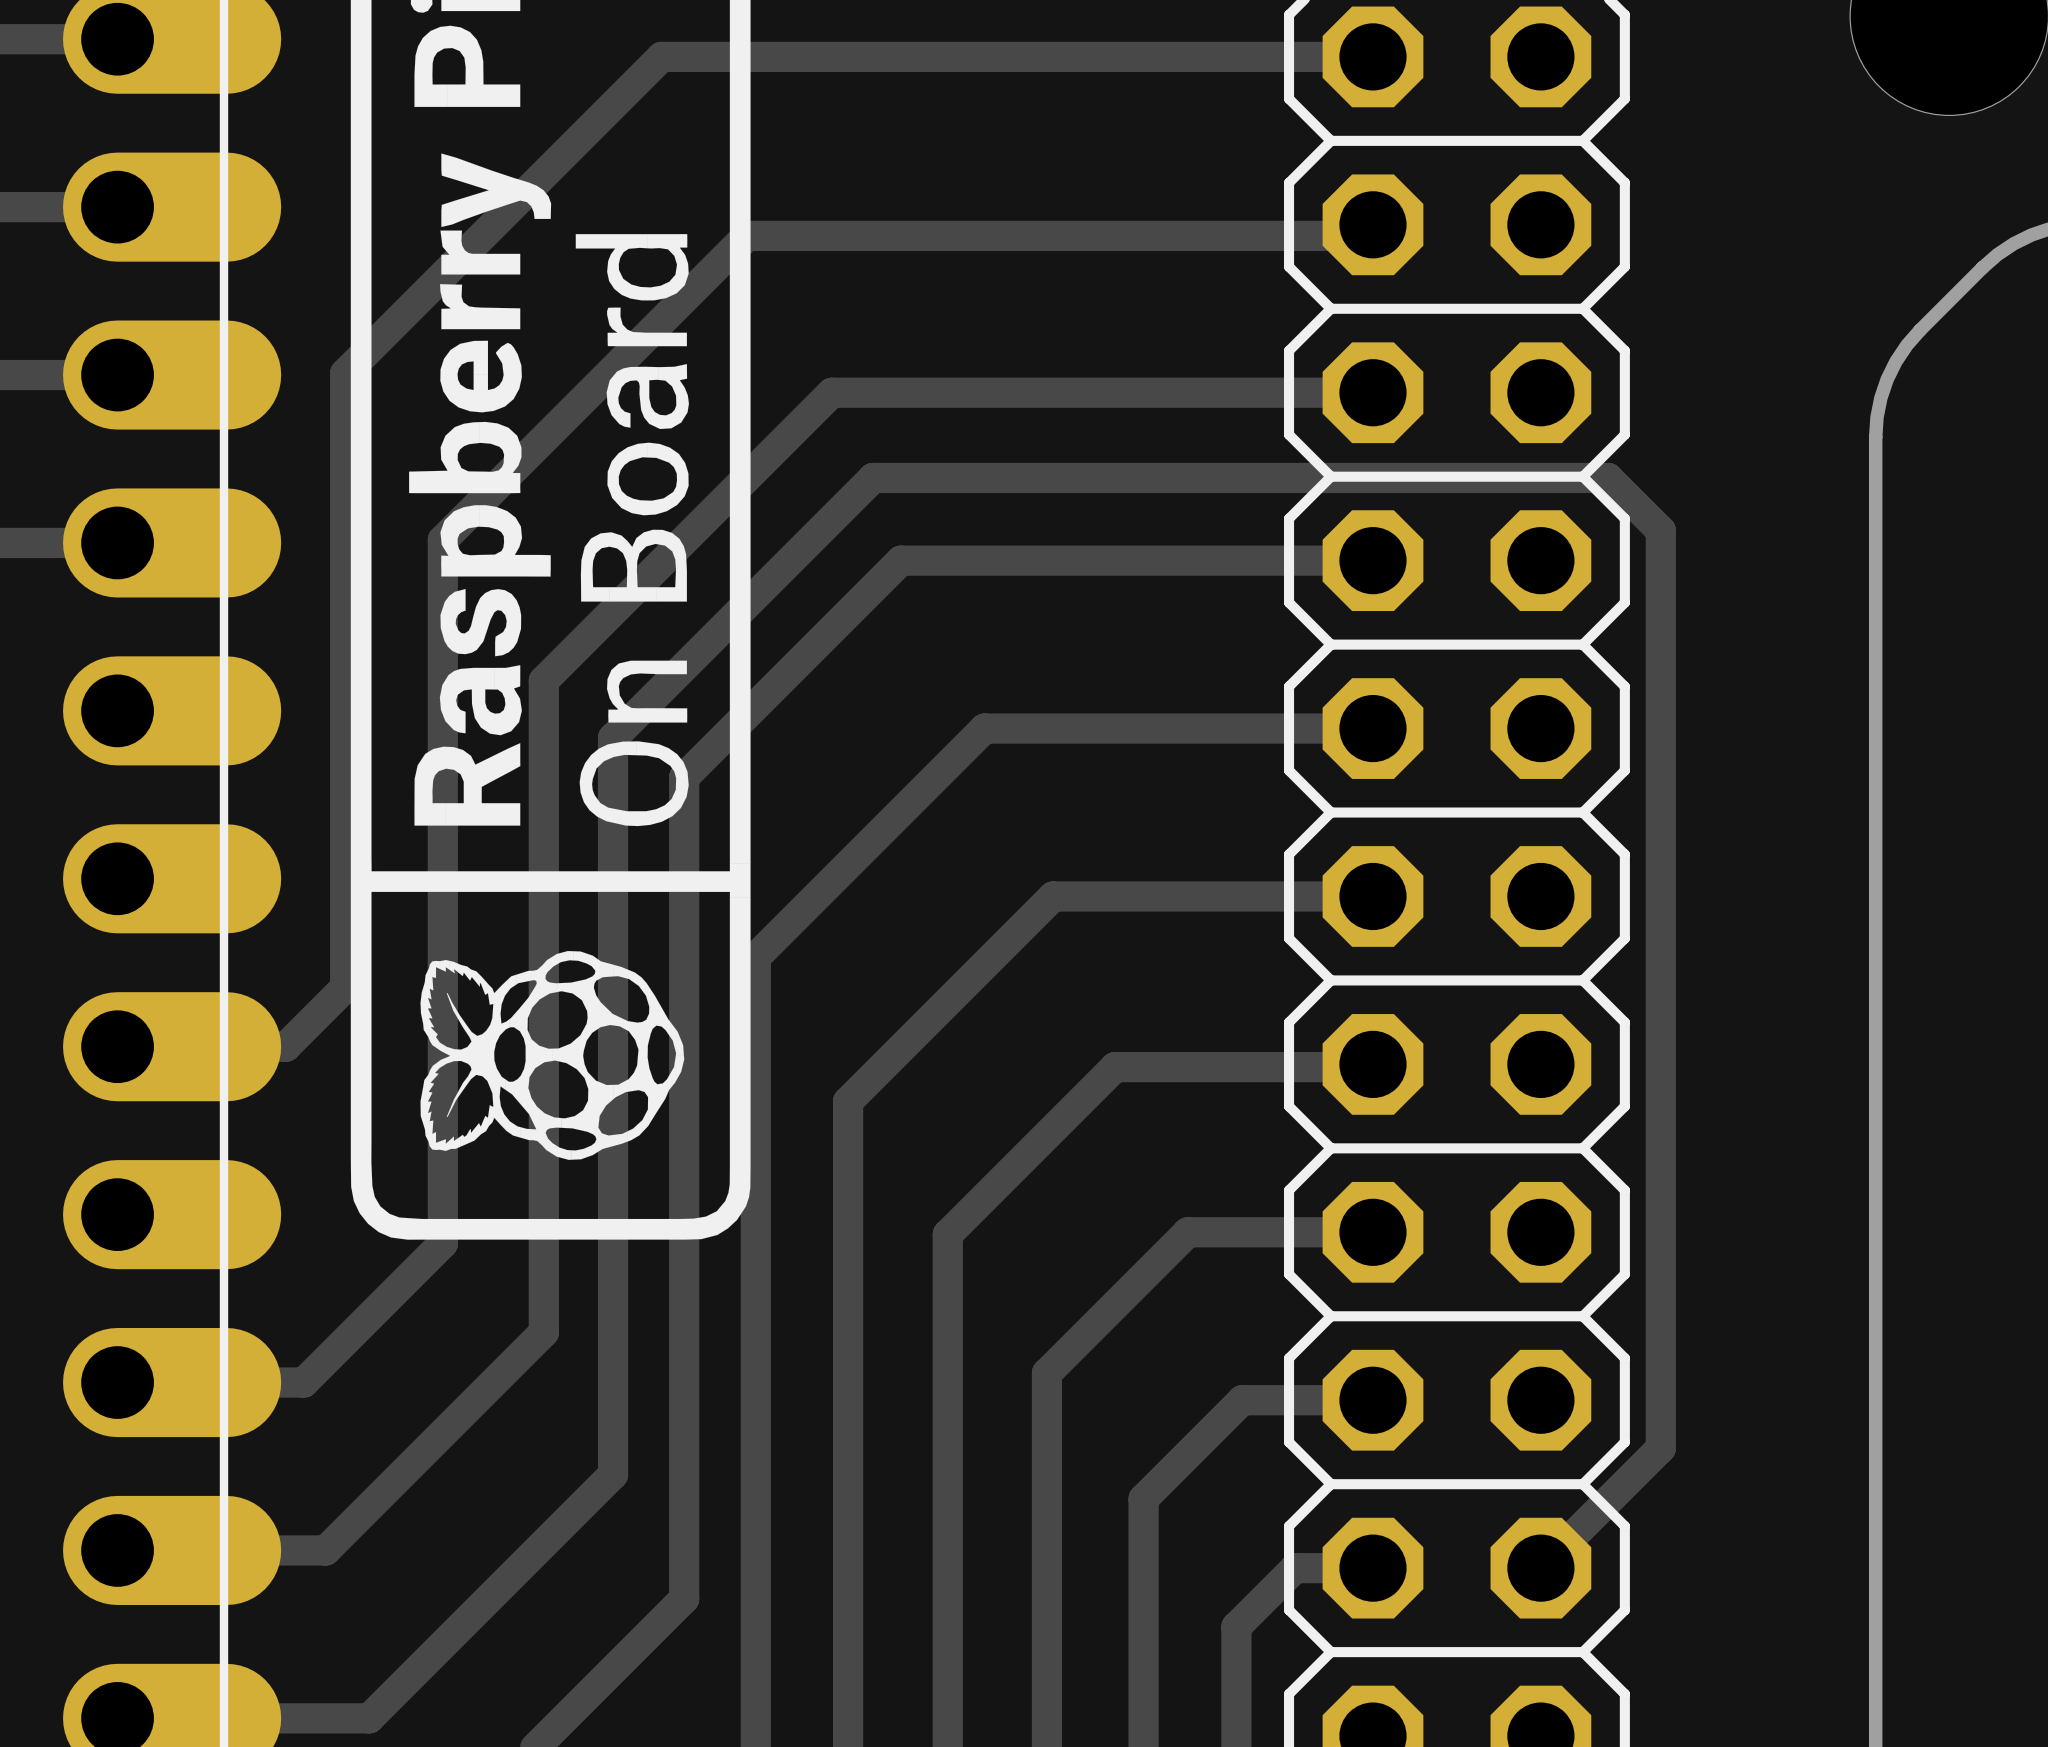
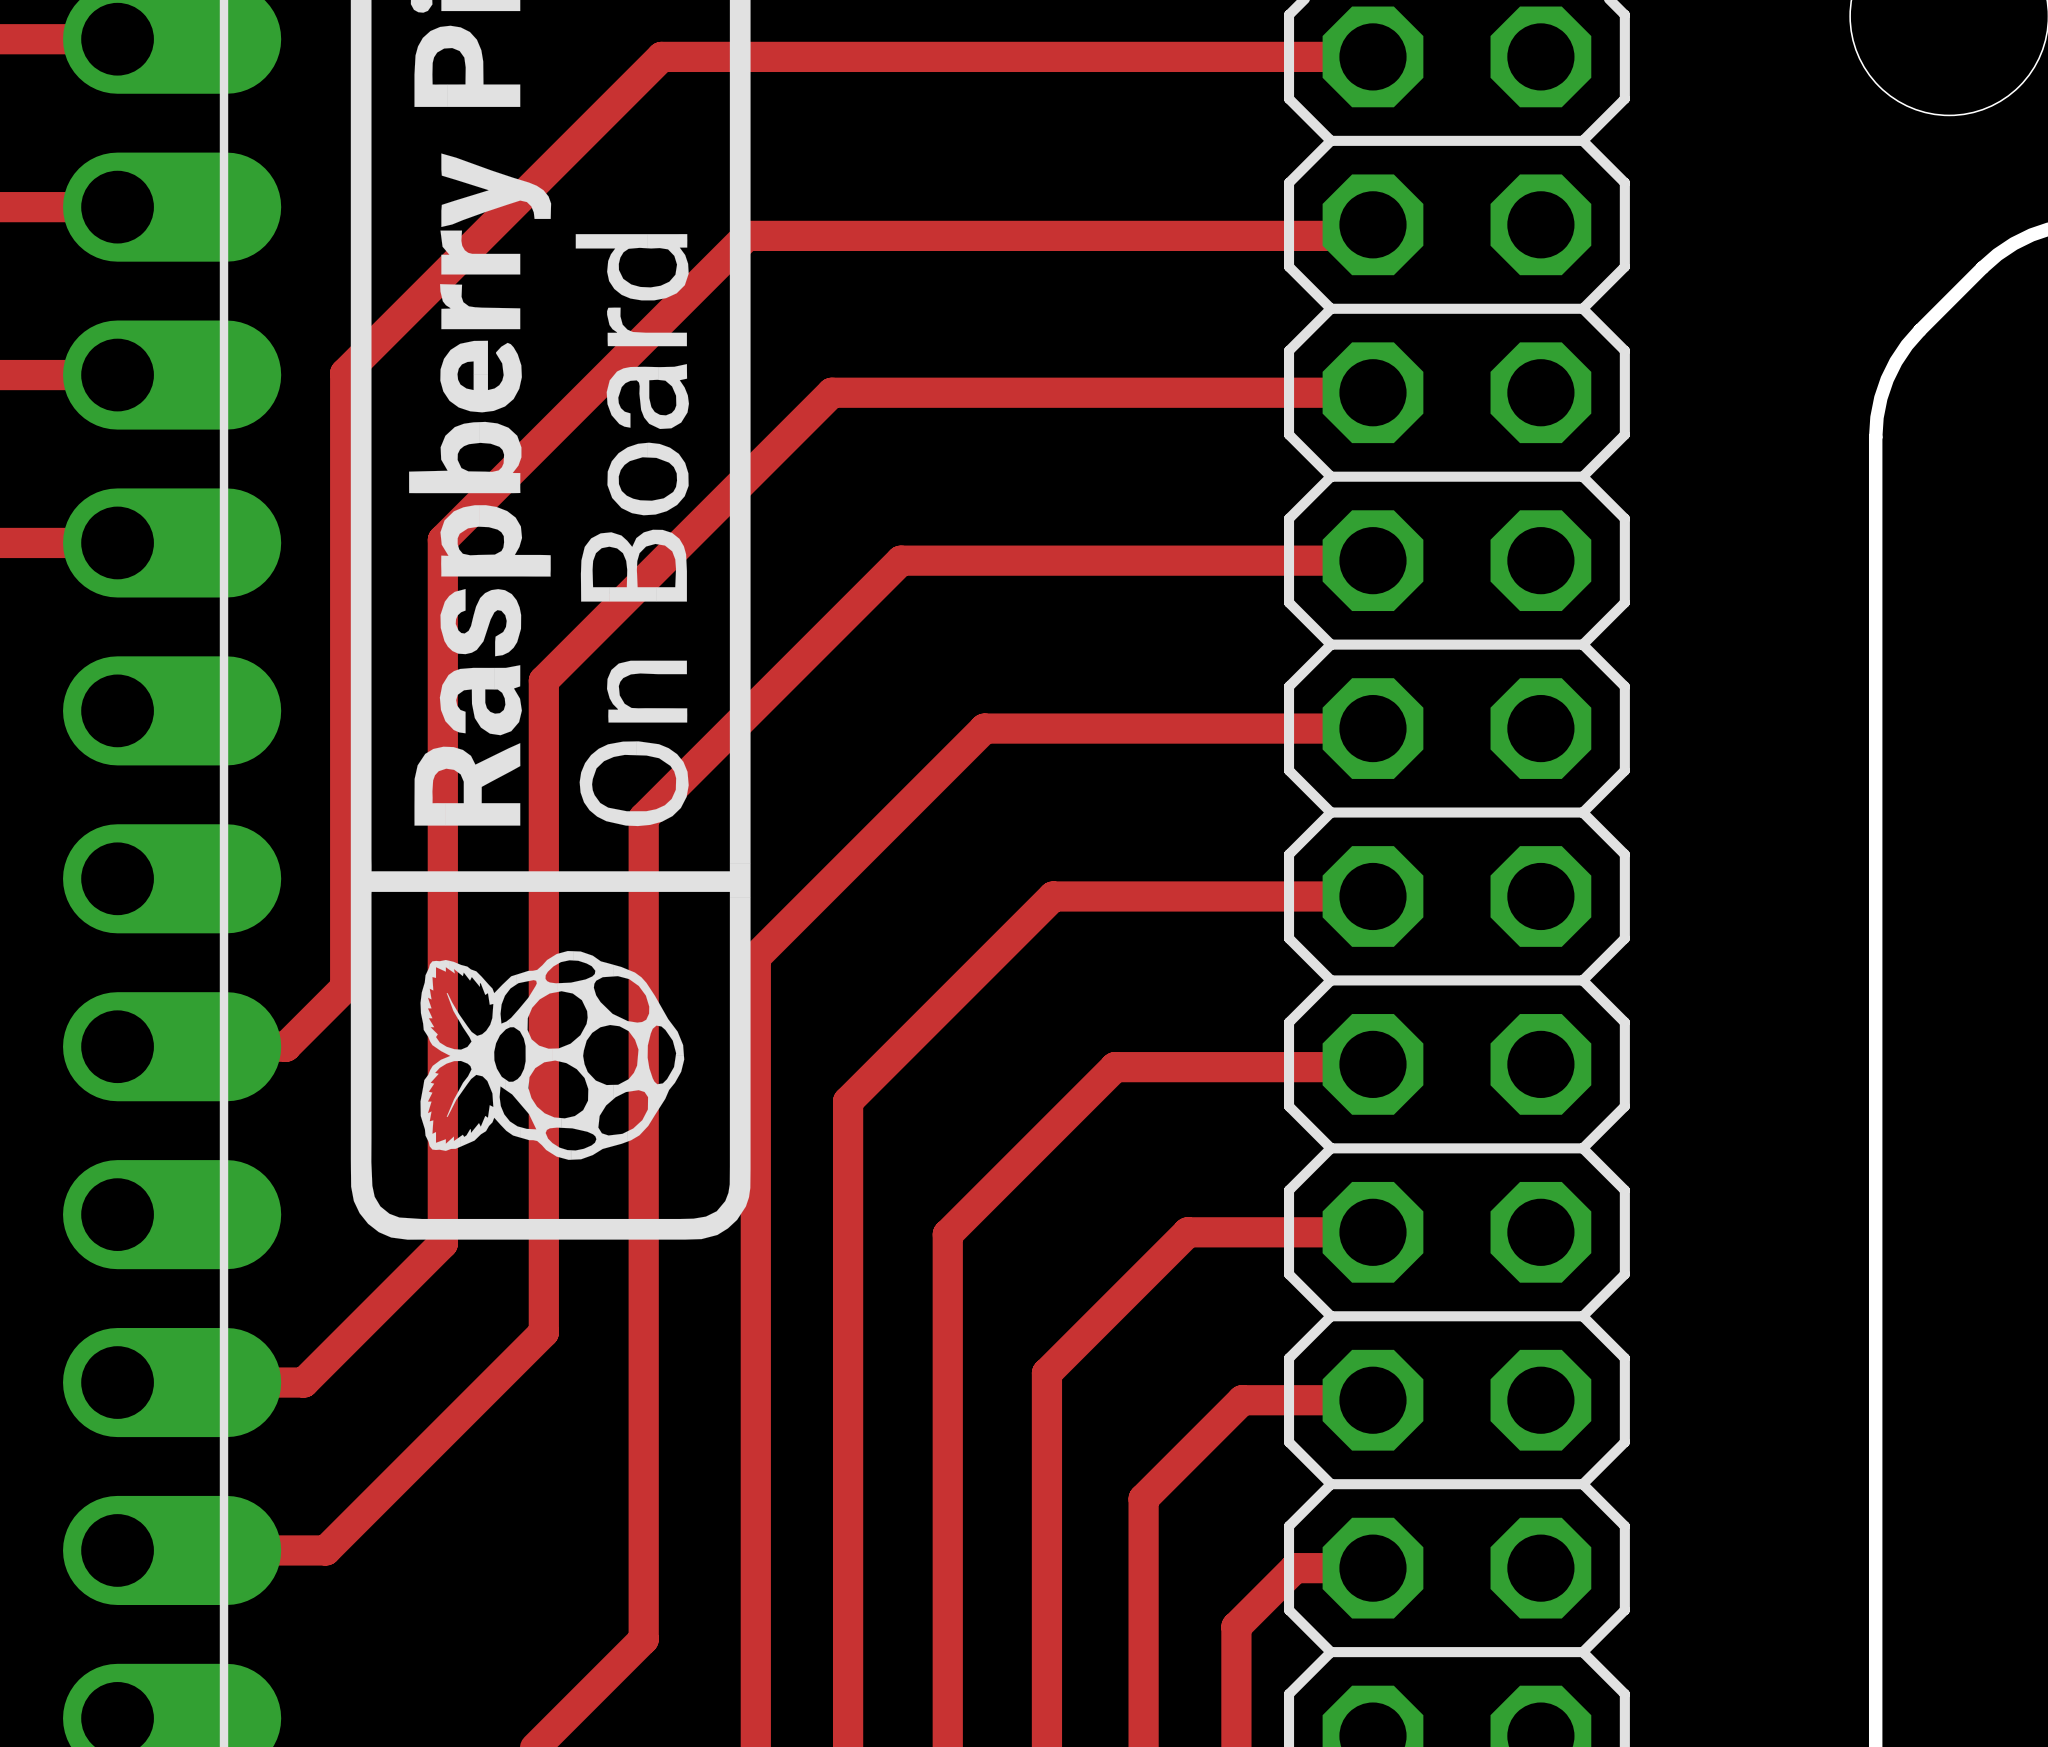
track: (684, 777) (684, 1598) (643, 1639) -> (684, 777) (643, 817) (643, 1639)
track: (1540, 1568) (1660, 1448) (1660, 530) (1608, 477) (873, 477) (613, 738) (613, 1474) (369, 1718) (117, 1718) -> none

